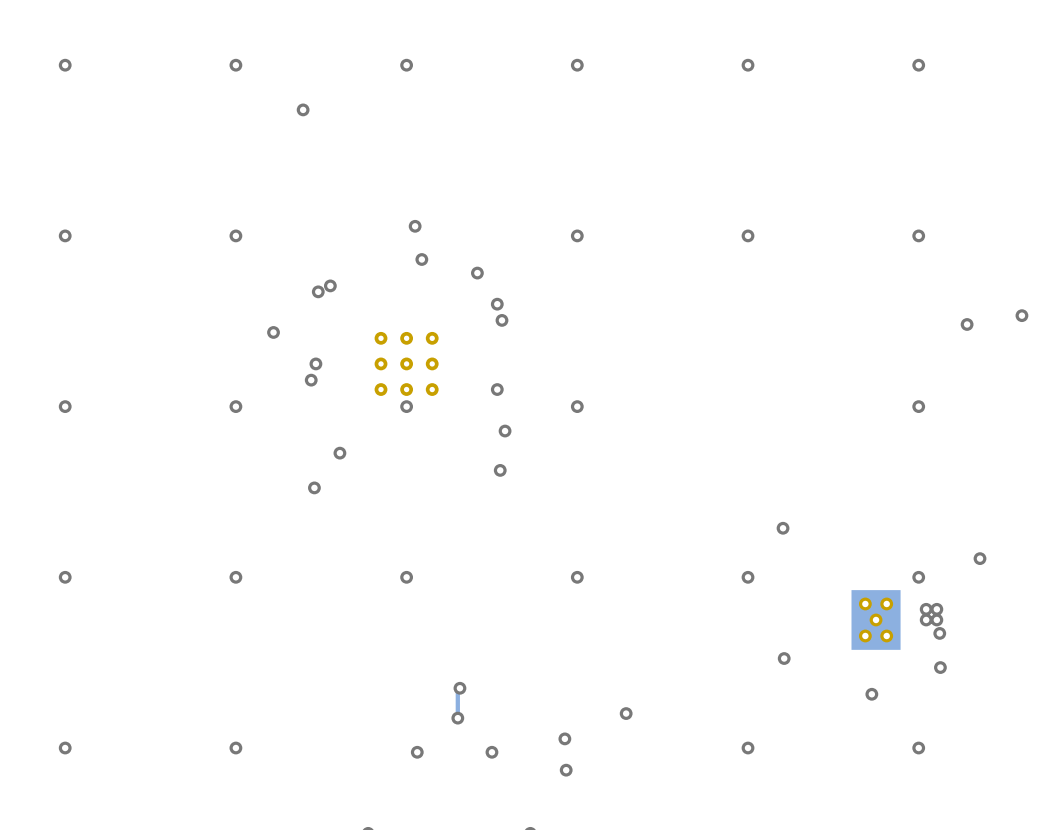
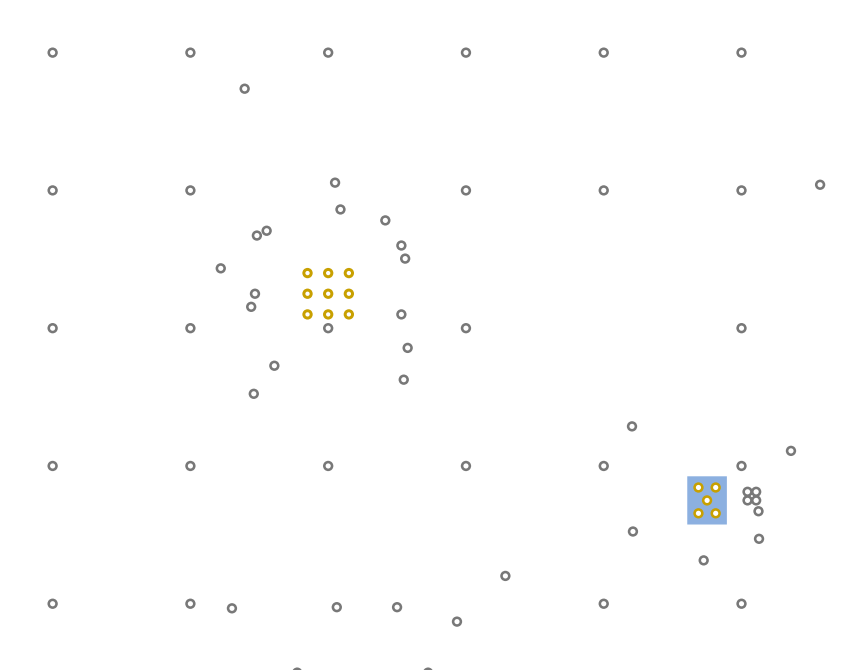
via: none -> (820, 184)
via: (1021, 315) -> none
via: (967, 324) -> none
track: (459, 688) (457, 690) (457, 718) -> none
via: (459, 688) -> none
via: (457, 718) -> none
via: (564, 738) -> none
via: none -> (231, 608)

